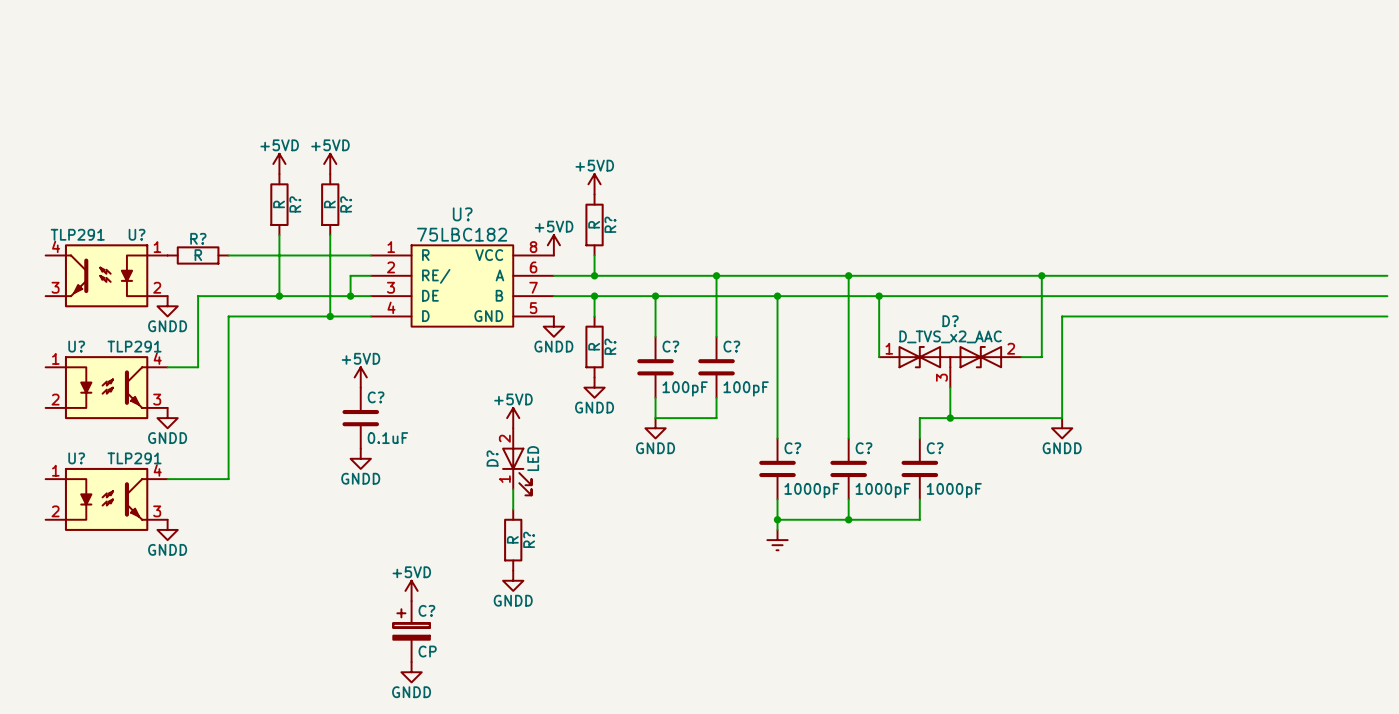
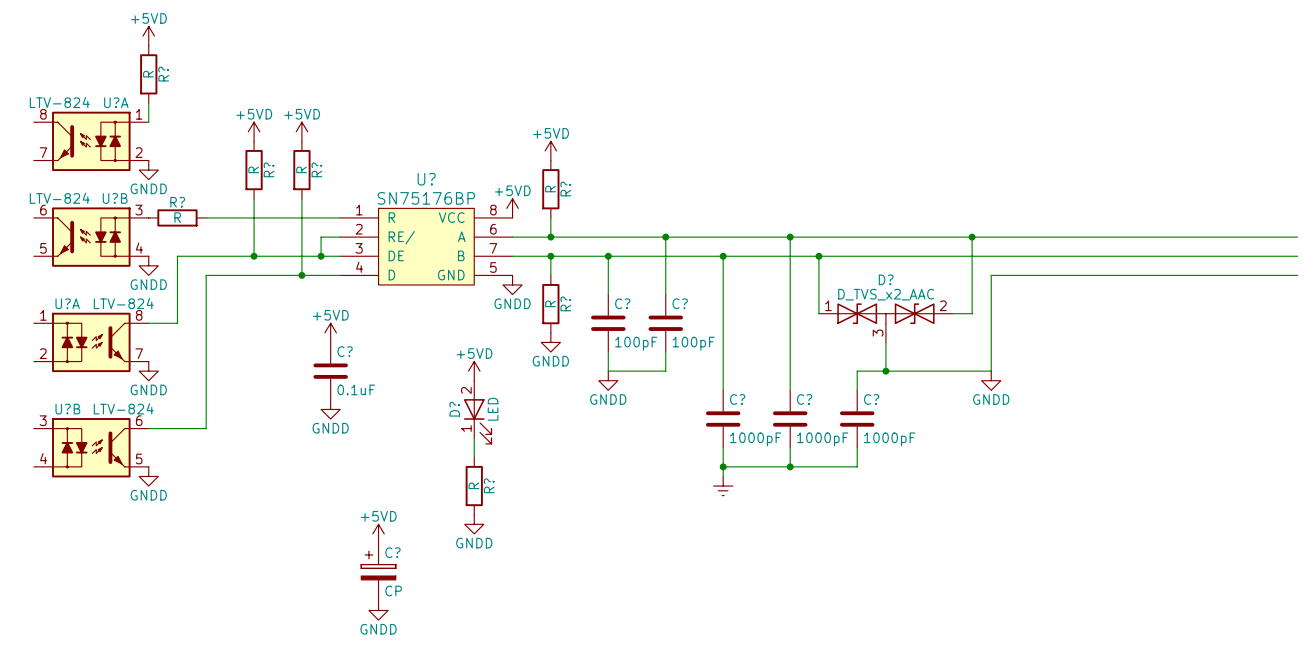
power symbol: none -> +5VD (148, 36)
R?: none -> R (148, 74)
wire: none -> (148, 103) (148, 122)
U?A: none -> LTV-824 (91, 141)
power symbol: none -> GNDD (148, 170)
U? value: 75LBC182 (462, 234) -> SN75176BP (426, 198)
U?: TLP291 (106, 275) -> none
U?B: none -> LTV-824 (91, 237)
U?: TLP291 (106, 387) -> none
U?A: none -> LTV-824 (91, 342)
U?: TLP291 (106, 499) -> none
U?B: none -> LTV-824 (91, 447)

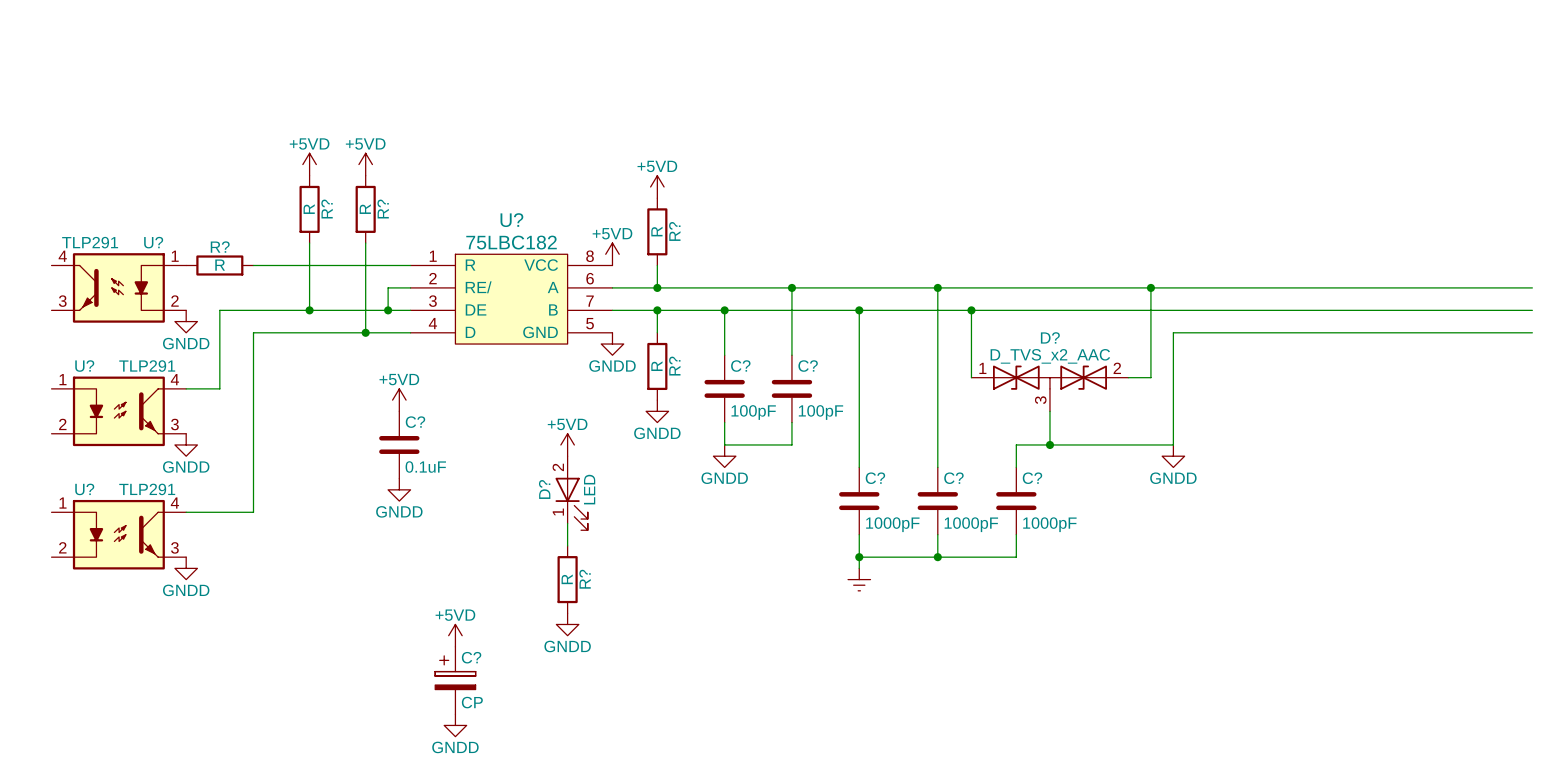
power symbol: +5VD (148, 36) -> none
R?: R (148, 74) -> none
wire: (148, 103) (148, 122) -> none
U?A: LTV-824 (91, 141) -> none
power symbol: GNDD (148, 170) -> none
U? value: SN75176BP (426, 198) -> 75LBC182 (511, 242)
U?B: LTV-824 (91, 237) -> none
U?: none -> TLP291 (118, 287)
U?A: LTV-824 (91, 342) -> none
U?: none -> TLP291 (118, 411)
U?B: LTV-824 (91, 447) -> none
U?: none -> TLP291 (118, 534)

